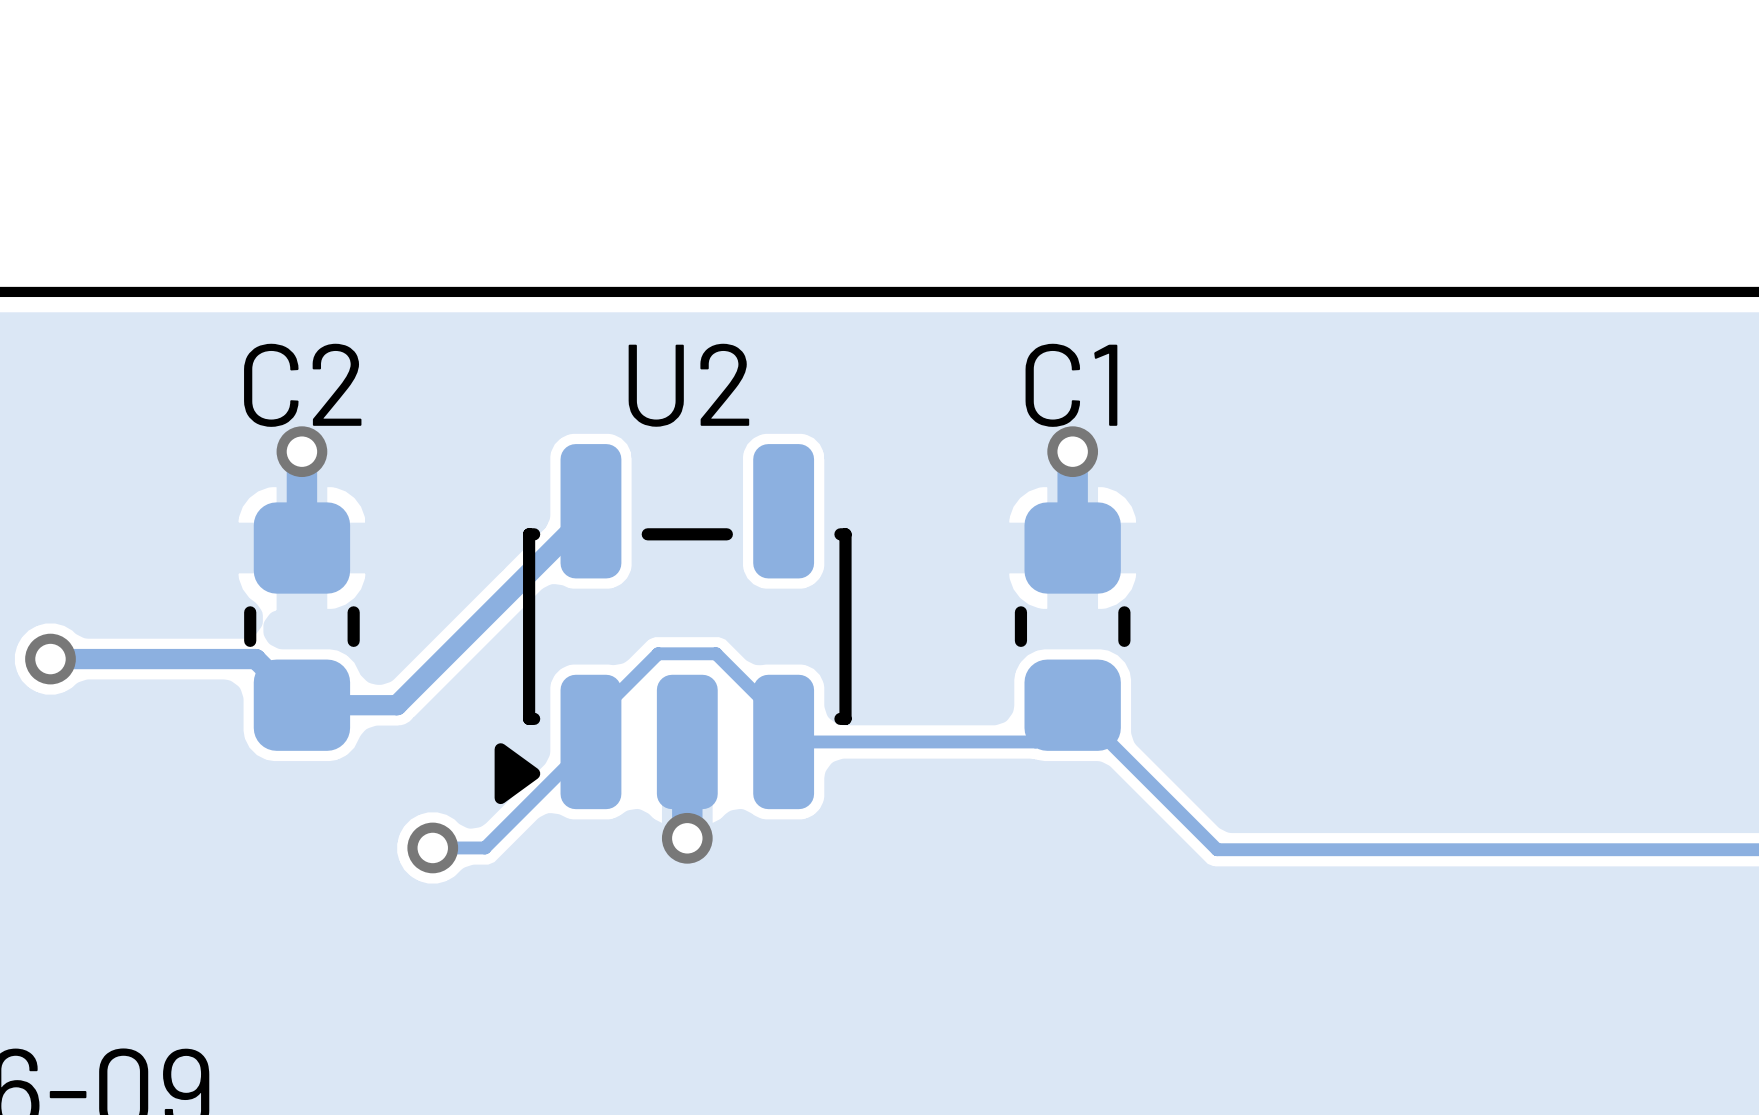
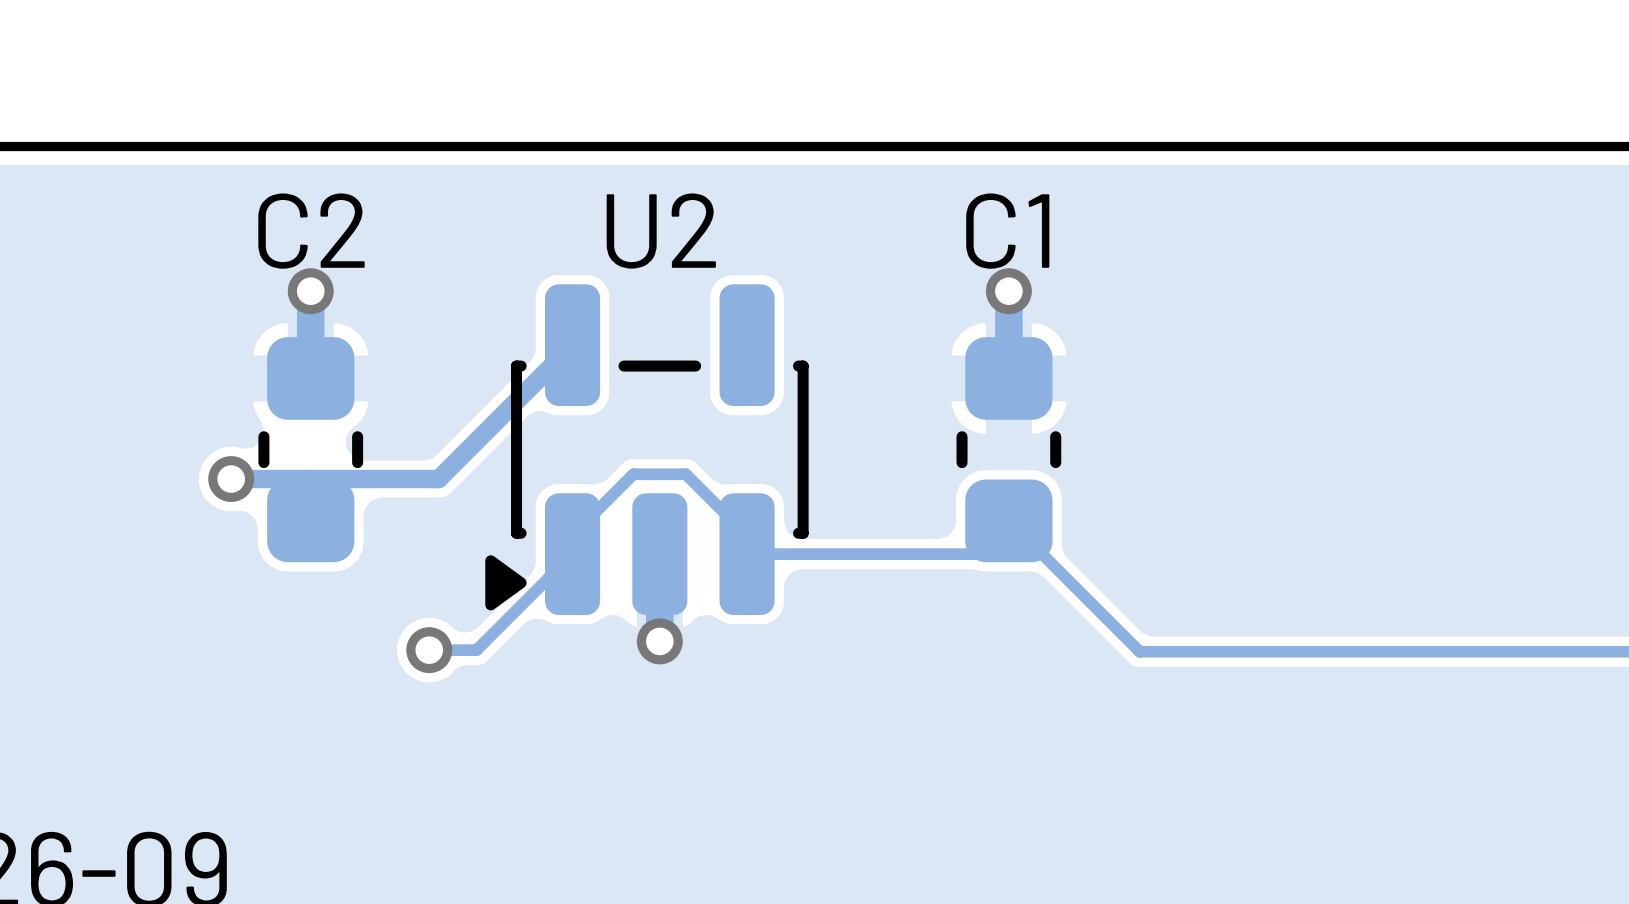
via position: (50, 659) -> (231, 479)
track: (214, 659) (50, 659) -> none
track: (443, 659) (397, 705) (301, 705) (255, 659) -> (438, 479) (268, 479)

